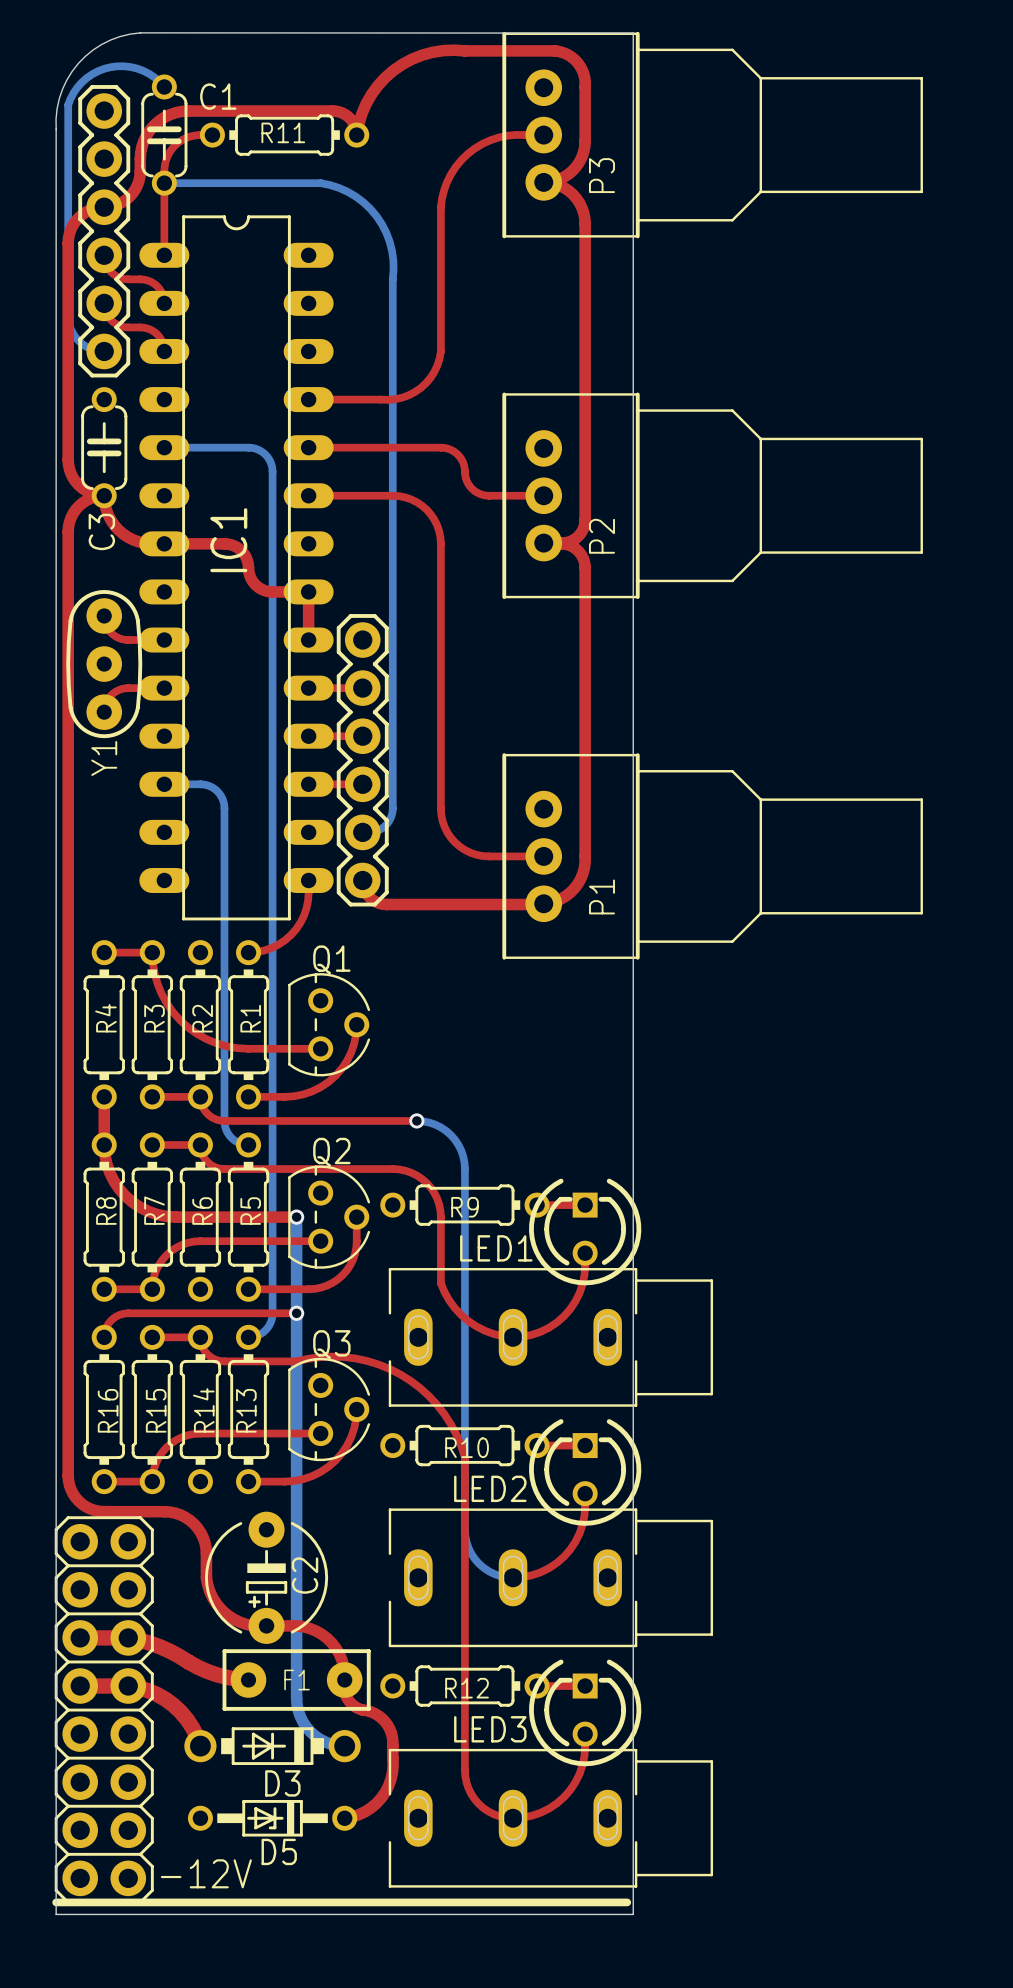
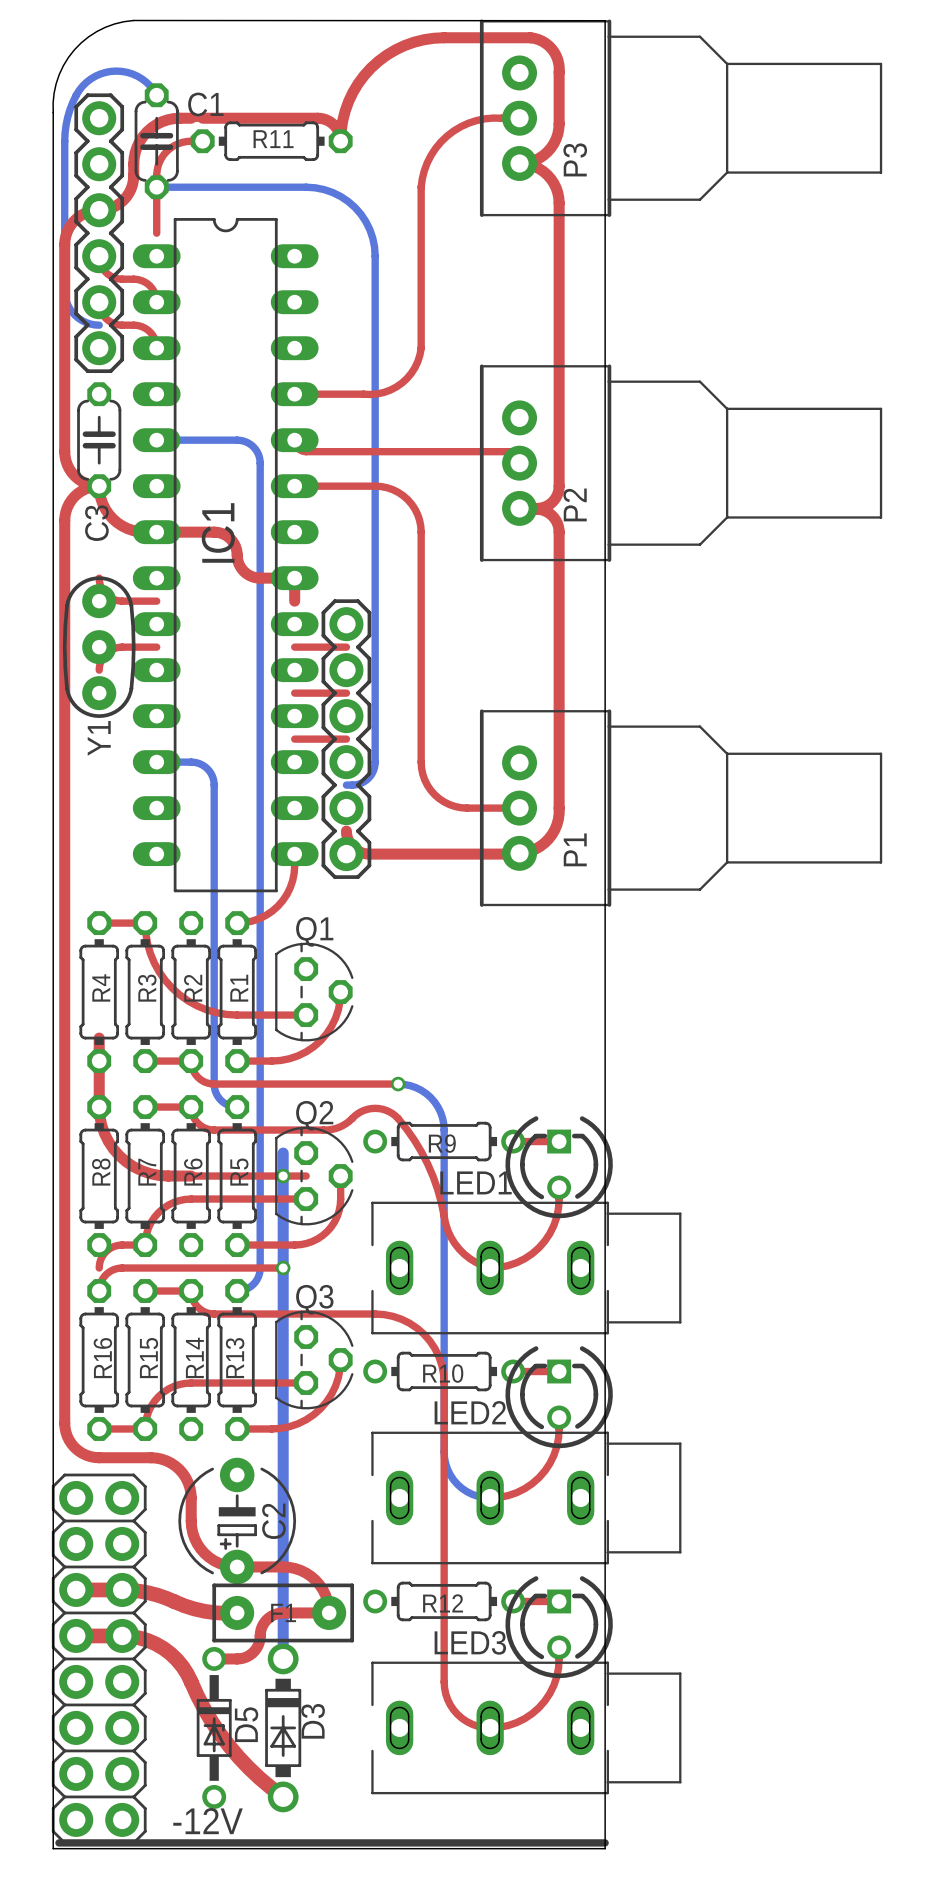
top track: (464, 50) (432, 52) (411, 59) (393, 70) (377, 85) (366, 103) (356, 135) (351, 120) (344, 114) (335, 111) (188, 111) (175, 112) (164, 117) (150, 129) (143, 140) (140, 152) (139, 180) (132, 193) (118, 204) (86, 212) (73, 225) (68, 238) (68, 267) -> (444, 37) (423, 39) (404, 45) (386, 55) (370, 68) (358, 83) (348, 101) (342, 121) (340, 141) (335, 127) (329, 121) (320, 118) (202, 118)
C1 footprint: [141, 74, 188, 196] -> [134, 83, 179, 200]
bottom track: (164, 86) (154, 77) (137, 68) (124, 66) (110, 67) (92, 74) (81, 82) (73, 92) (68, 105) -> none
bottom track: (68, 105) (68, 159) -> (156, 95) (146, 82) (132, 74) (111, 71) (95, 76) (82, 86) (72, 102) (66, 125) (64, 141)
R11 footprint: [199, 114, 370, 156] -> [190, 121, 353, 162]
top track: (200, 135) (182, 139) (169, 153) (164, 166) (164, 195) -> (202, 141) (182, 142) (170, 148) (159, 162) (156, 175)
top track: none -> (191, 118) (167, 119) (156, 124) (147, 131) (139, 141) (135, 152) (133, 180) (126, 196) (112, 207) (90, 211) (78, 217) (69, 227) (64, 244)
bottom track: (164, 183) (320, 183) (339, 187) (363, 202) (381, 224) (392, 250) (392, 279) -> (156, 187) (306, 187) (324, 189) (340, 196) (360, 214) (369, 229) (375, 256)
part position: (104, 231) -> (99, 233)
top track: (104, 255) (107, 267) (116, 276) (125, 279) (146, 280) (154, 284) (161, 291) (164, 303) -> (99, 256) (102, 267) (108, 274) (116, 278) (136, 279) (145, 282) (153, 290) (156, 302)
top track: (104, 303) (106, 312) (113, 322) (122, 326) (143, 327) (152, 330) (161, 339) (164, 351) -> (99, 302) (102, 313) (110, 322) (119, 325) (139, 325) (147, 329) (153, 336) (156, 348)
top track: (440, 351) (437, 365) (430, 377) (420, 387) (408, 395) (387, 399) (308, 399) -> (421, 325) (421, 348) (417, 361) (406, 378) (396, 386) (383, 392) (370, 394) (294, 394)
C3 footprint: [81, 387, 128, 509] -> [77, 382, 122, 499]
bottom track: (164, 447) (248, 447) (257, 449) (265, 454) (271, 465) (272, 495) -> (156, 440) (243, 440) (255, 449) (260, 463)
top track: (308, 447) (447, 448) (459, 457) (468, 483) (479, 493) (488, 495) (543, 495) -> (294, 440) (298, 448) (306, 451) (509, 451) (516, 455) (519, 463)
top track: (68, 459) (70, 473) (78, 485) (90, 493) (104, 495) -> (64, 428) (65, 456) (69, 468) (81, 481) (99, 486)
top track: (104, 495) (86, 500) (73, 513) (68, 527) (68, 555) -> (99, 486) (86, 488) (74, 496) (67, 507) (64, 520)
top track: (104, 495) (105, 508) (110, 519) (118, 529) (128, 537) (146, 543) (224, 543) (233, 545) (245, 555) (250, 577) (260, 588) (269, 591) (308, 591) (308, 615) -> (99, 486) (100, 498) (105, 509) (117, 522) (127, 528) (145, 532) (220, 532) (232, 541) (236, 549) (238, 563) (248, 575) (257, 577) (294, 578)
top track: (308, 495) (392, 495) (405, 497) (416, 502) (426, 509) (437, 525) (440, 537) (440, 567) -> (294, 486) (375, 486) (392, 489) (407, 499) (415, 509) (419, 520) (421, 532)
IC1 position: (236, 567) -> (225, 555)
part position: (104, 664) -> (99, 647)
text position: Y1 (104, 758) -> Y1 (99, 738)
part position: (362, 760) -> (346, 739)
bottom track: (164, 784) (203, 784) (215, 789) (223, 802) (224, 832) -> (156, 762) (200, 763) (211, 773) (214, 785)
top track: (308, 880) (306, 908) (296, 929) (278, 944) (264, 950) (248, 952) -> (294, 854) (292, 880) (282, 900) (265, 915) (252, 921) (237, 923)
R4 footprint: [83, 940, 125, 1110] -> [79, 911, 120, 1074]
R3 footprint: [131, 940, 174, 1110] -> [125, 911, 165, 1074]
R2 footprint: [179, 940, 222, 1110] -> [171, 911, 211, 1074]
R1 footprint: [227, 940, 270, 1110] -> [217, 911, 257, 1074]
top track: (104, 952) (152, 952) (154, 974) (167, 1003) (180, 1020) (206, 1039) (237, 1048) (320, 1048) -> (99, 923) (145, 923) (150, 953) (159, 972) (179, 995) (197, 1005) (226, 1014) (306, 1015)
Q1 footprint: [288, 973, 371, 1077] -> [275, 942, 354, 1042]
top track: (356, 1024) (354, 1043) (347, 1060) (335, 1075) (320, 1087) (294, 1096) (248, 1096) -> none
top track: (152, 1096) (200, 1096) (203, 1108) (212, 1117) (221, 1120) (248, 1120) -> none
top track: none -> (145, 1061) (191, 1061) (192, 1069) (197, 1077) (211, 1083) (398, 1084)
bottom track: (224, 1120) (226, 1130) (231, 1137) (239, 1143) (248, 1144) -> (214, 1061) (214, 1087) (217, 1095) (225, 1103) (237, 1107)
top track: (284, 1120) (416, 1120) -> (271, 1061) (298, 1055) (320, 1040) (335, 1018) (340, 992)
bottom track: (416, 1120) (429, 1122) (440, 1127) (450, 1135) (458, 1144) (464, 1162) (464, 1193) -> (398, 1084) (415, 1087) (430, 1097) (440, 1112) (444, 1130)
via position: (416, 1120) -> (398, 1084)
R8 footprint: [83, 1132, 125, 1302] -> [79, 1095, 120, 1257]
R7 footprint: [131, 1132, 174, 1302] -> [125, 1095, 165, 1257]
R6 footprint: [179, 1132, 222, 1302] -> [171, 1095, 211, 1257]
R5 footprint: [227, 1132, 270, 1302] -> [217, 1095, 257, 1257]
top track: (104, 1144) (106, 1163) (113, 1181) (132, 1202) (148, 1211) (176, 1217) (296, 1217) -> (99, 1084) (101, 1124) (108, 1141) (119, 1155) (133, 1166) (150, 1173) (191, 1176)
top track: (152, 1144) (200, 1144) (202, 1154) (207, 1161) (221, 1168) (392, 1169) (405, 1170) (416, 1175) (430, 1187) (439, 1204) (440, 1283) (449, 1300) (461, 1315) (476, 1326) (494, 1334) (513, 1337) -> (145, 1107) (191, 1107) (192, 1115) (197, 1123) (205, 1128) (214, 1130) (327, 1129) (342, 1125) (357, 1113) (367, 1109) (378, 1108) (389, 1111) (406, 1129) (427, 1164) (437, 1189) (447, 1230) (454, 1243) (470, 1258) (490, 1268)
Q2 footprint: [288, 1165, 371, 1269] -> [275, 1126, 354, 1226]
via position: (296, 1217) -> (283, 1176)
top track: (356, 1217) (356, 1247) (353, 1259) (346, 1270) (332, 1282) (314, 1288) (248, 1289) -> none
top track: (200, 1241) (182, 1244) (166, 1255) (156, 1270) (152, 1289) (104, 1289) -> none
top track: none -> (340, 1176) (340, 1205) (337, 1216) (331, 1227) (322, 1235) (312, 1241) (300, 1244) (283, 1245)
top track: (152, 1313) (248, 1313) -> (145, 1245) (146, 1233) (154, 1217) (163, 1208) (179, 1200) (306, 1199)
bottom track: (272, 1313) (270, 1322) (265, 1330) (257, 1335) (248, 1337) -> (260, 1245) (259, 1271) (257, 1279) (248, 1287) (237, 1291)
via position: (296, 1313) -> (283, 1268)
R16 footprint: [83, 1324, 125, 1495] -> [79, 1279, 120, 1441]
R15 footprint: [131, 1324, 174, 1495] -> [125, 1279, 165, 1441]
R14 footprint: [179, 1324, 222, 1495] -> [171, 1279, 211, 1441]
R13 footprint: [227, 1324, 270, 1495] -> [217, 1279, 257, 1441]
top track: none -> (145, 1268) (119, 1268) (110, 1271) (102, 1279) (99, 1291)
top track: (200, 1337) (202, 1346) (207, 1354) (221, 1361) (296, 1361) (320, 1357) (344, 1357) (367, 1361) (390, 1369) (410, 1381) (437, 1405) (451, 1424) (464, 1457) -> (145, 1291) (191, 1291) (192, 1299) (197, 1307) (211, 1313) (375, 1314) (393, 1316) (417, 1328) (429, 1341) (438, 1356) (444, 1383)
top track: none -> (191, 1268) (283, 1268)
Q3 footprint: [288, 1357, 371, 1462] -> [275, 1310, 354, 1410]
top track: (356, 1409) (354, 1428) (347, 1445) (335, 1460) (320, 1471) (294, 1481) (248, 1481) -> (340, 1360) (338, 1377) (331, 1394) (320, 1408) (306, 1419) (280, 1428) (237, 1428)
top track: (320, 1433) (187, 1435) (171, 1443) (162, 1452) (153, 1469) (152, 1481) (104, 1481) -> (306, 1383) (179, 1384) (163, 1392) (154, 1400) (146, 1417) (145, 1428) (99, 1428)
top track: (68, 1475) (73, 1493) (82, 1504) (90, 1508) (104, 1511) (169, 1512) (189, 1520) (197, 1528) (205, 1542) (206, 1577) (209, 1591) (221, 1609) (232, 1618) (252, 1625) (303, 1626) (321, 1634) (331, 1642) (341, 1660) (344, 1673) (344, 1689) (347, 1698) (356, 1707) (371, 1711) (382, 1718) (389, 1729) (392, 1741) (392, 1772) (385, 1792) (376, 1803) (364, 1811) (344, 1818) -> (64, 1400) (65, 1432) (71, 1444) (81, 1453) (94, 1457) (156, 1458) (166, 1460) (179, 1469) (189, 1487) (192, 1532) (197, 1543) (209, 1557) (219, 1563) (231, 1566) (295, 1568) (311, 1576) (323, 1589) (327, 1601) (329, 1612) (274, 1614) (263, 1624) (258, 1644) (251, 1654) (240, 1658) (214, 1658)
C2 position: (266, 1577) -> (237, 1520)
top track: (80, 1637) (128, 1637) (138, 1640) (169, 1651) (207, 1671) (227, 1677) (248, 1680) -> none
top track: none -> (76, 1589) (139, 1591) (204, 1611) (237, 1612)
F1 position: (296, 1680) -> (283, 1612)
top track: (80, 1686) (128, 1686) (156, 1694) (173, 1705) (187, 1719) (200, 1746) -> none
bottom track: (296, 1698) (300, 1716) (310, 1732) (326, 1742) (344, 1746) -> (283, 1612) (283, 1658)
part position: (104, 1710) -> (99, 1658)
top track: none -> (76, 1635) (139, 1638) (156, 1644) (170, 1653) (187, 1674) (204, 1708) (229, 1745) (259, 1778) (283, 1796)
D3 rotation: 0° (272, 1746) -> 90° counterclockwise (283, 1727)
D5 rotation: 0° (272, 1818) -> 90° counterclockwise (214, 1727)
text position: -12V (206, 1873) -> -12V (208, 1821)
line: (56, 1902) (627, 1902) -> (58, 1842) (605, 1842)
board edge: (56, 1914) (633, 1914) -> (53, 1819) (53, 1848) (605, 1848) (605, 1819)

